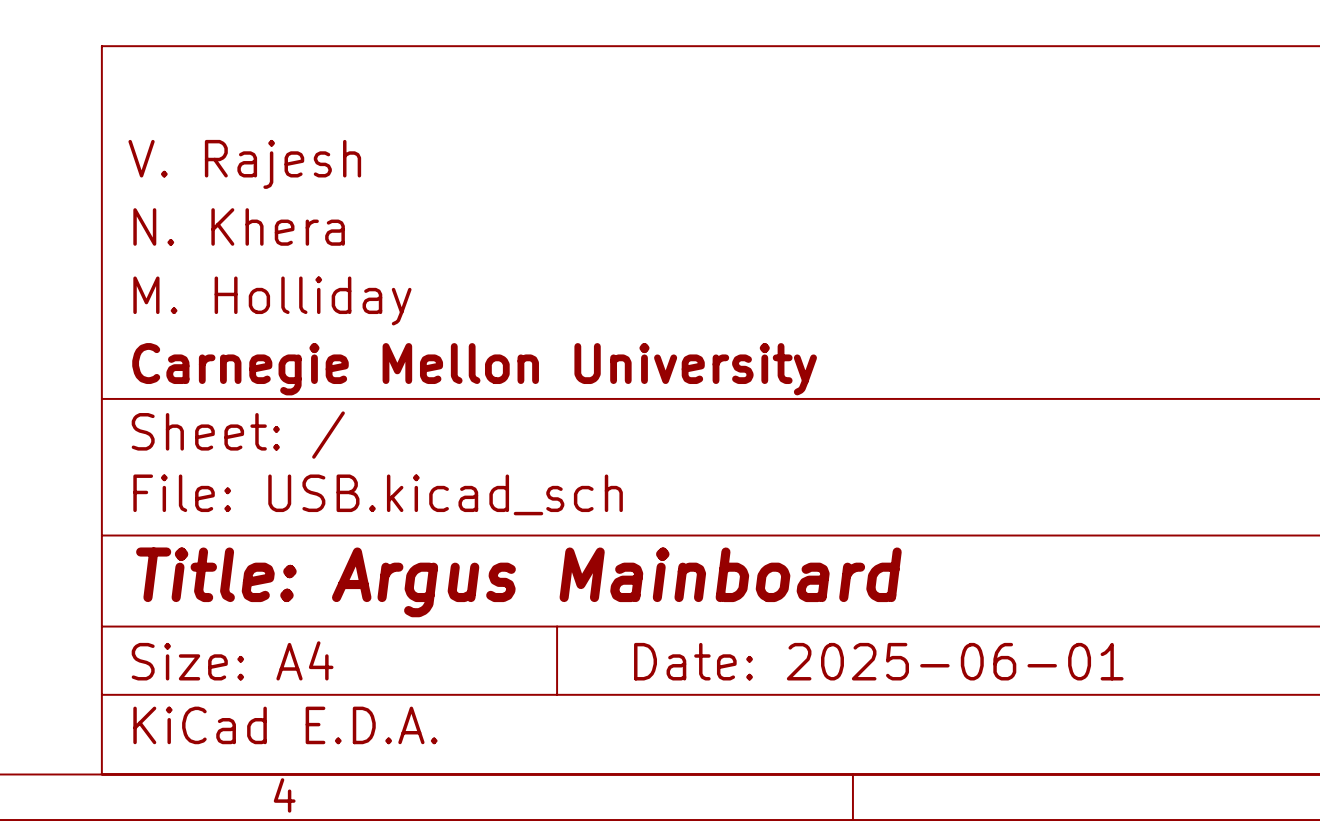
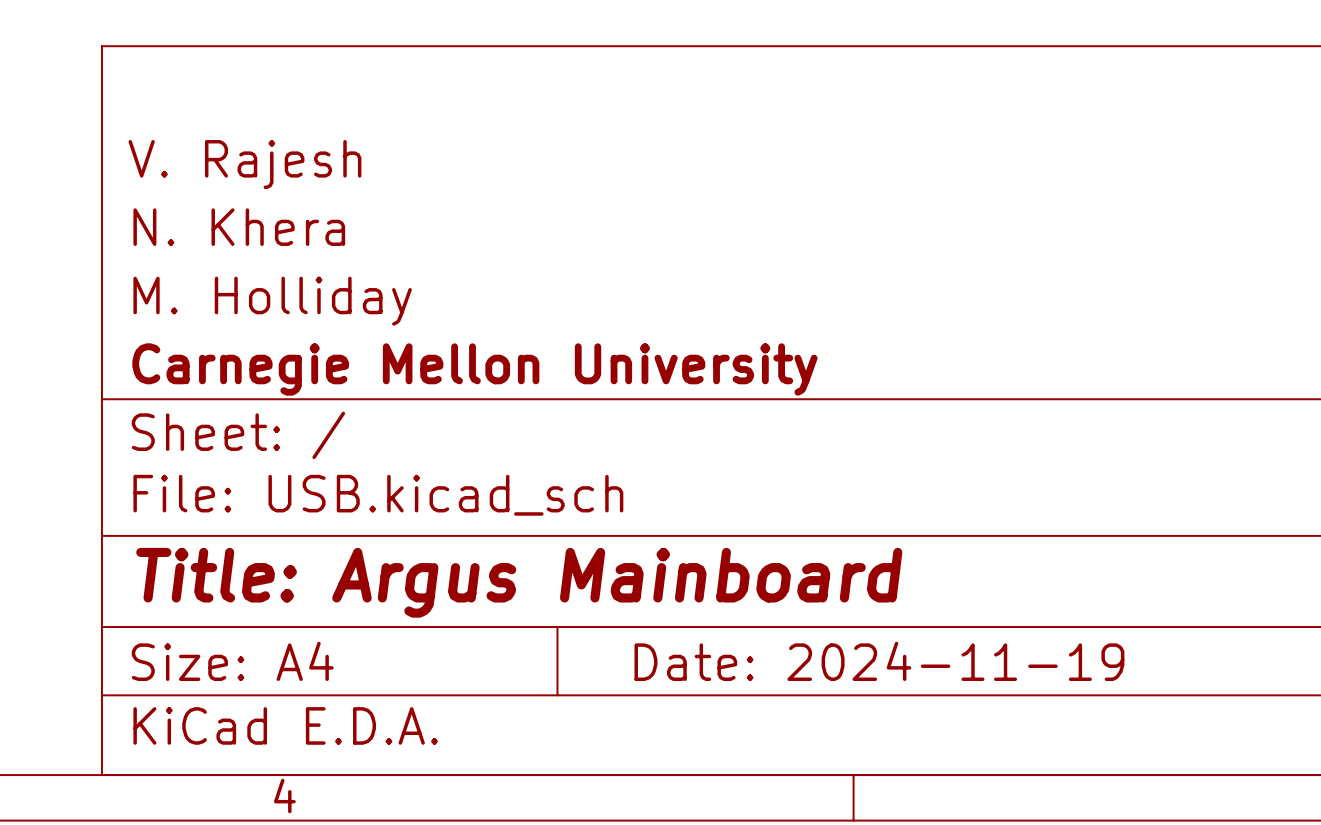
title block: Date: 2025-06-01 (878, 661) -> Date: 2024-11-19 (879, 661)

